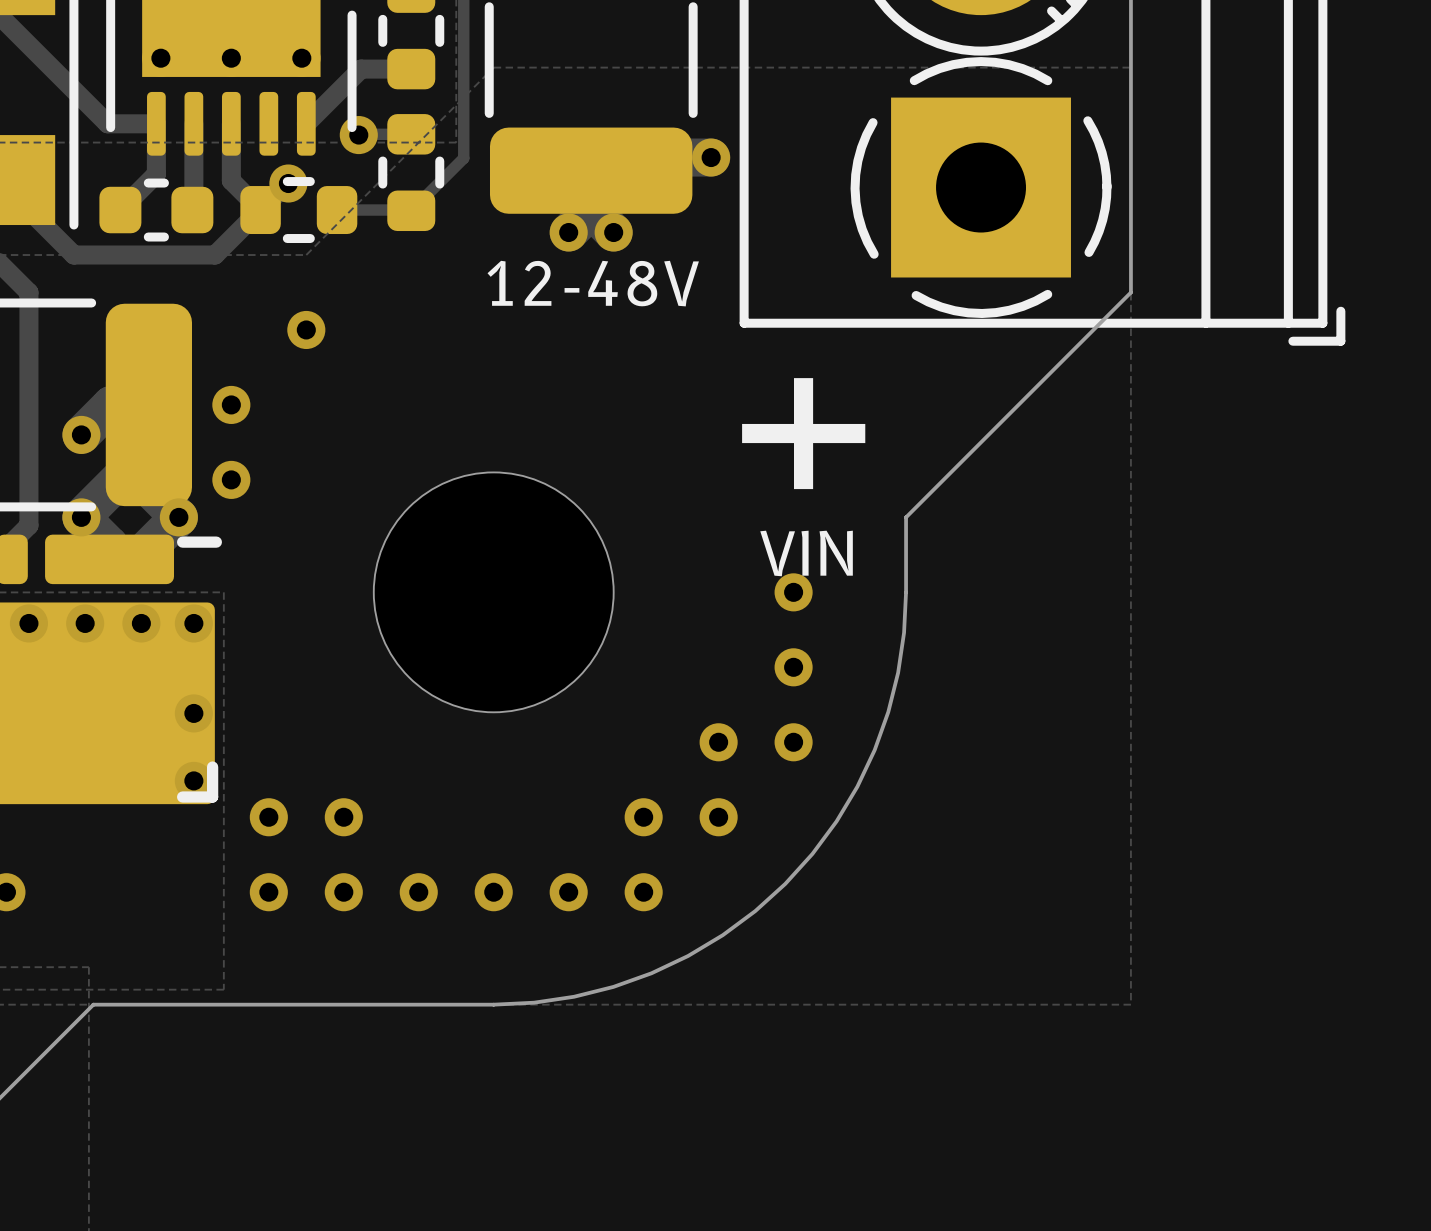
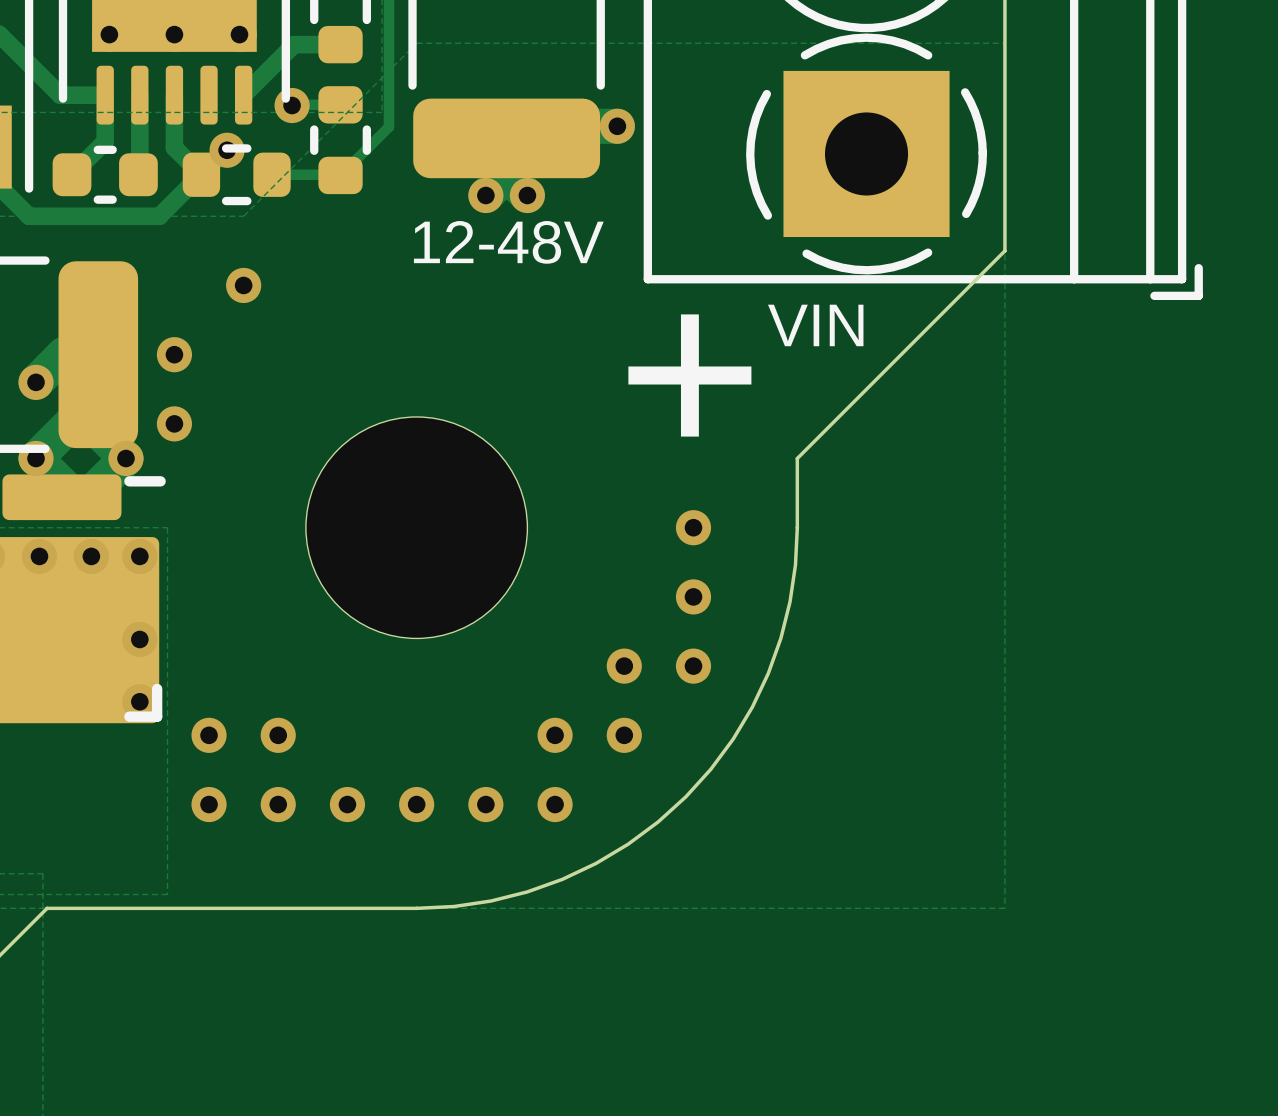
text position: VIN (806, 553) -> VIN (815, 325)

